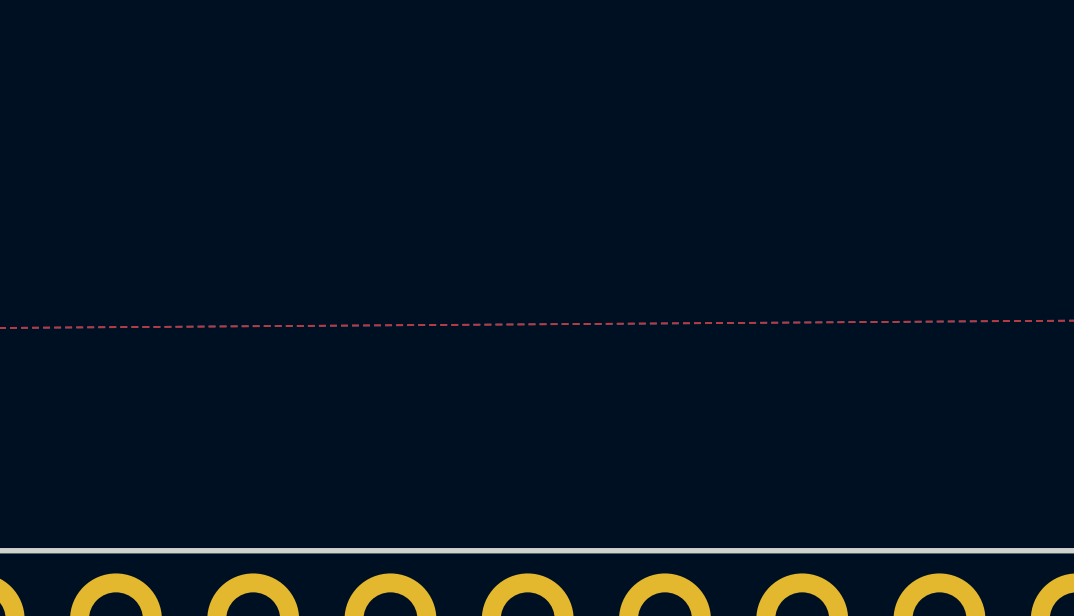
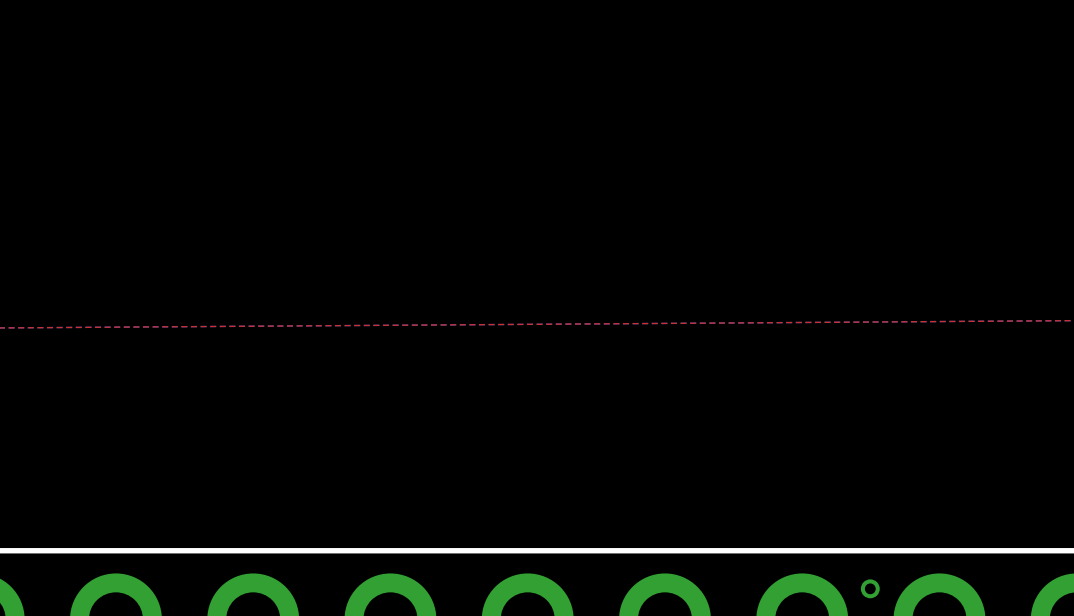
via: none -> (870, 588)

